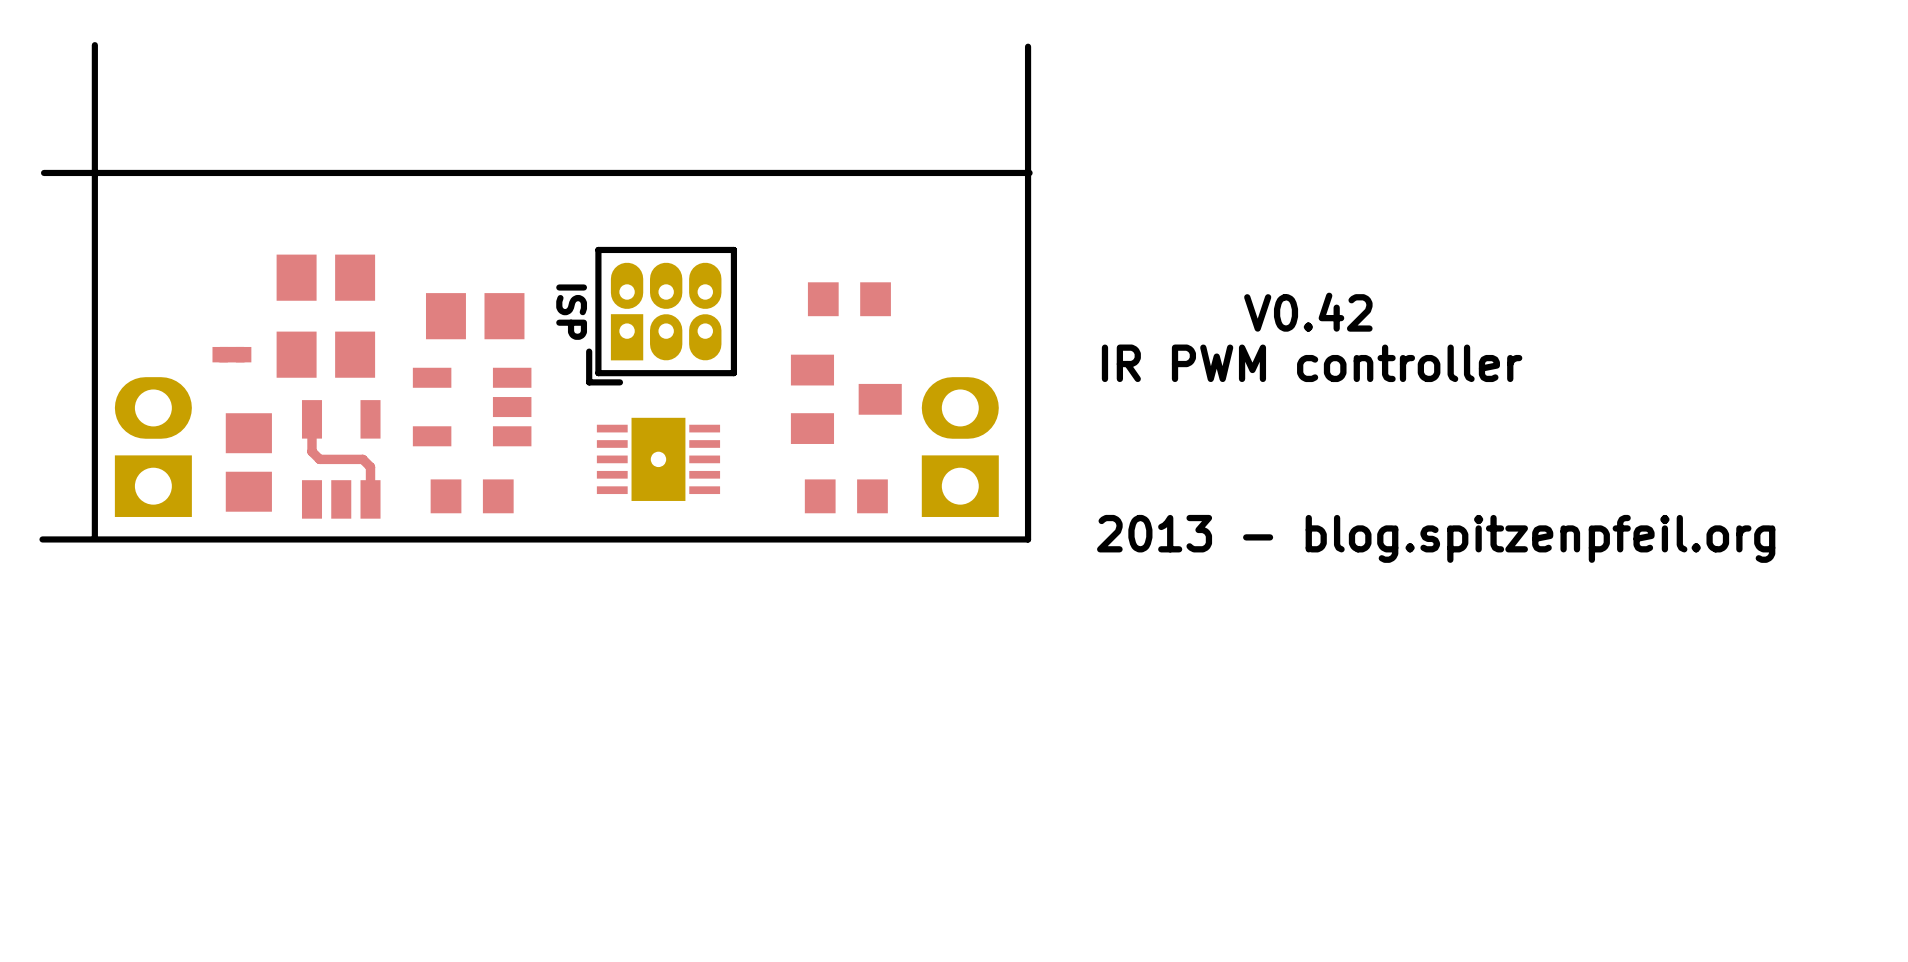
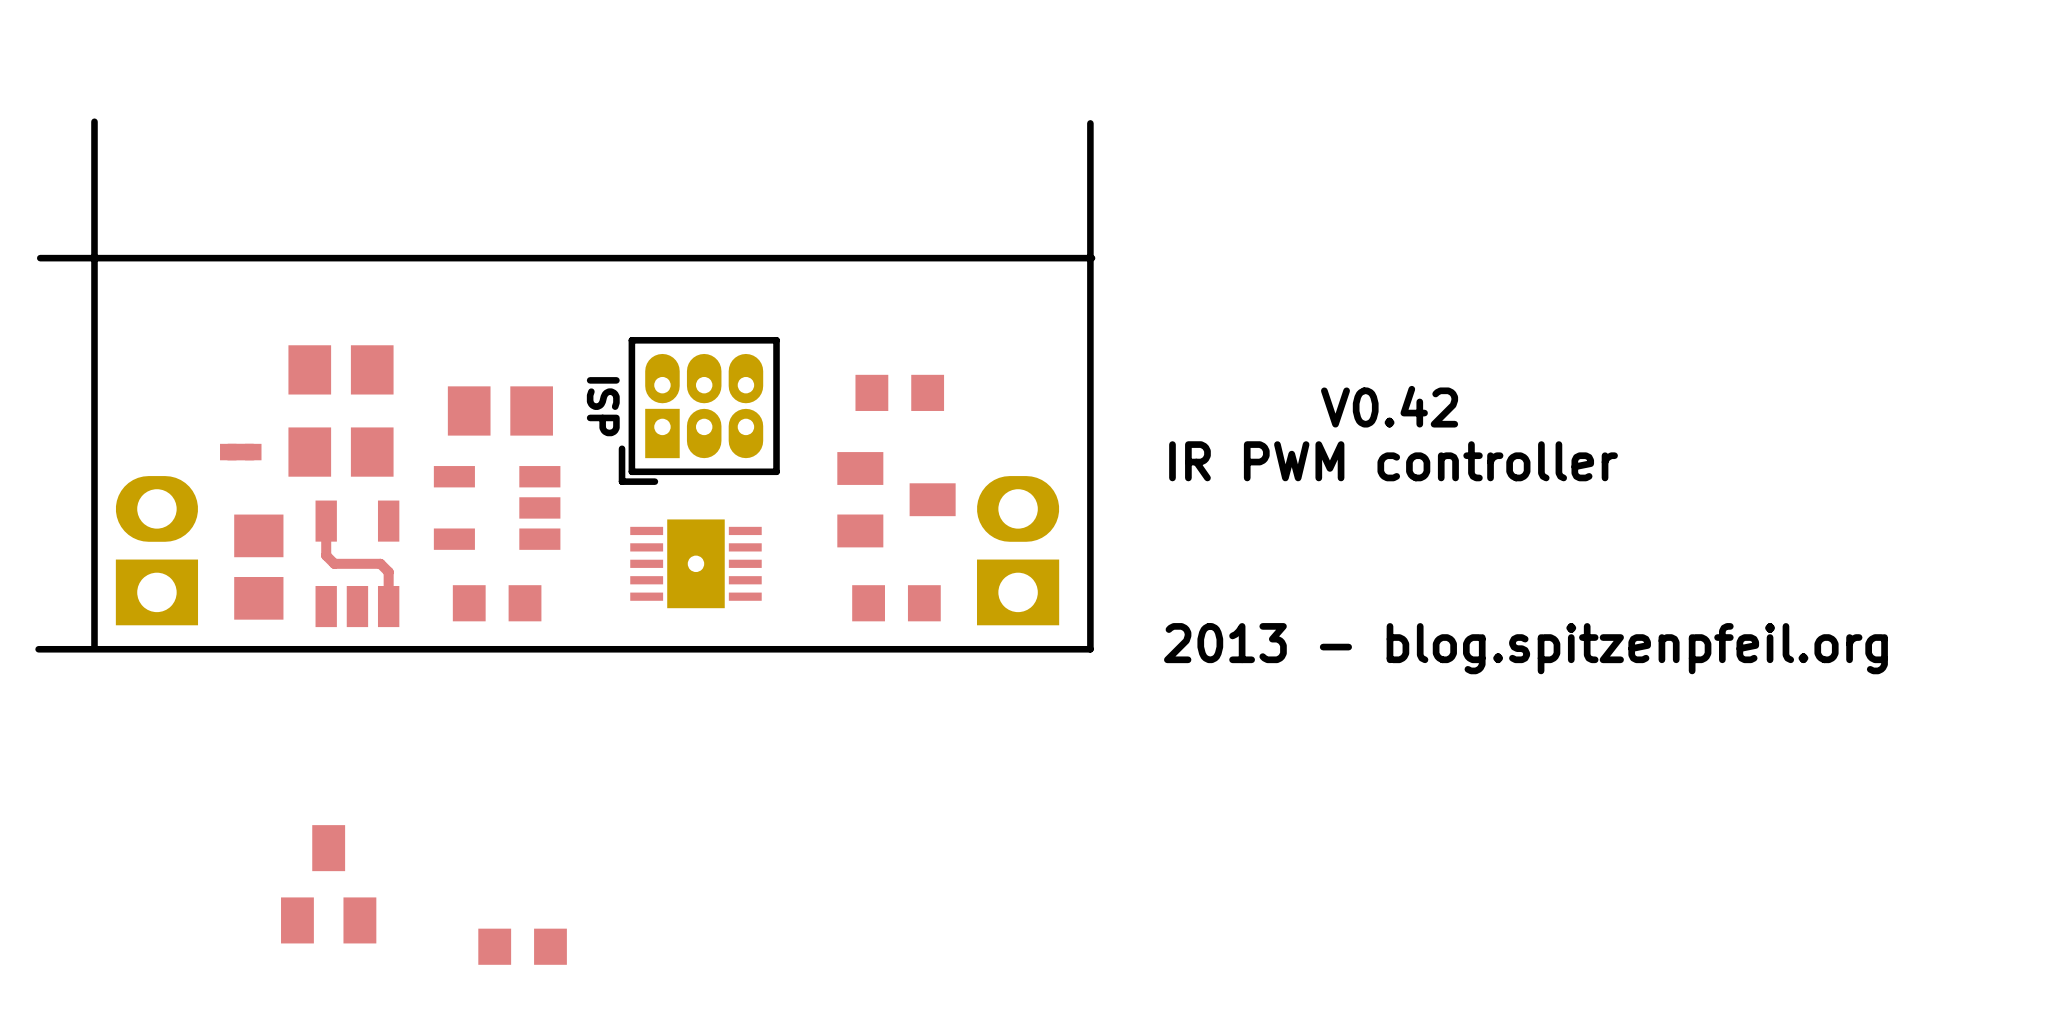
part: none -> (328, 884)
part: none -> (522, 946)

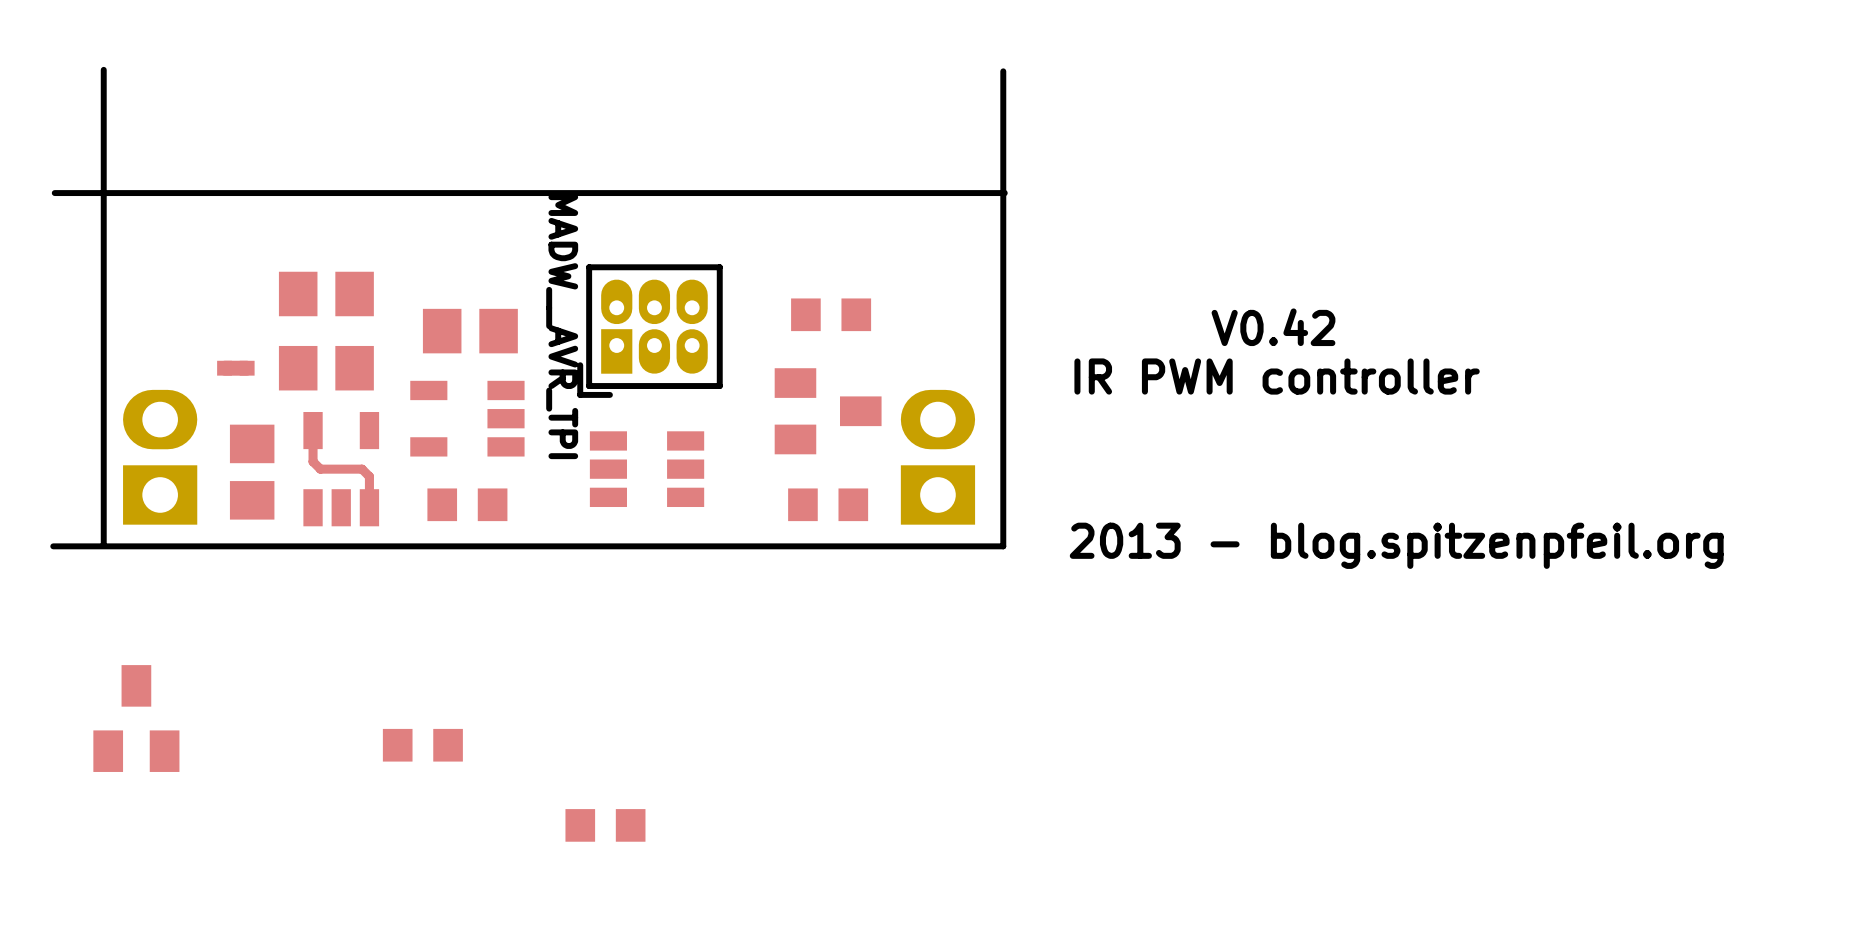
part value: ISP (603, 406) -> MADW__AVR_TPI (562, 326)
part footprint: [630, 519, 762, 609] -> [589, 431, 705, 508]
part: none -> (422, 745)
part position: (328, 884) -> (136, 718)
part: (522, 946) -> none
part: none -> (605, 825)

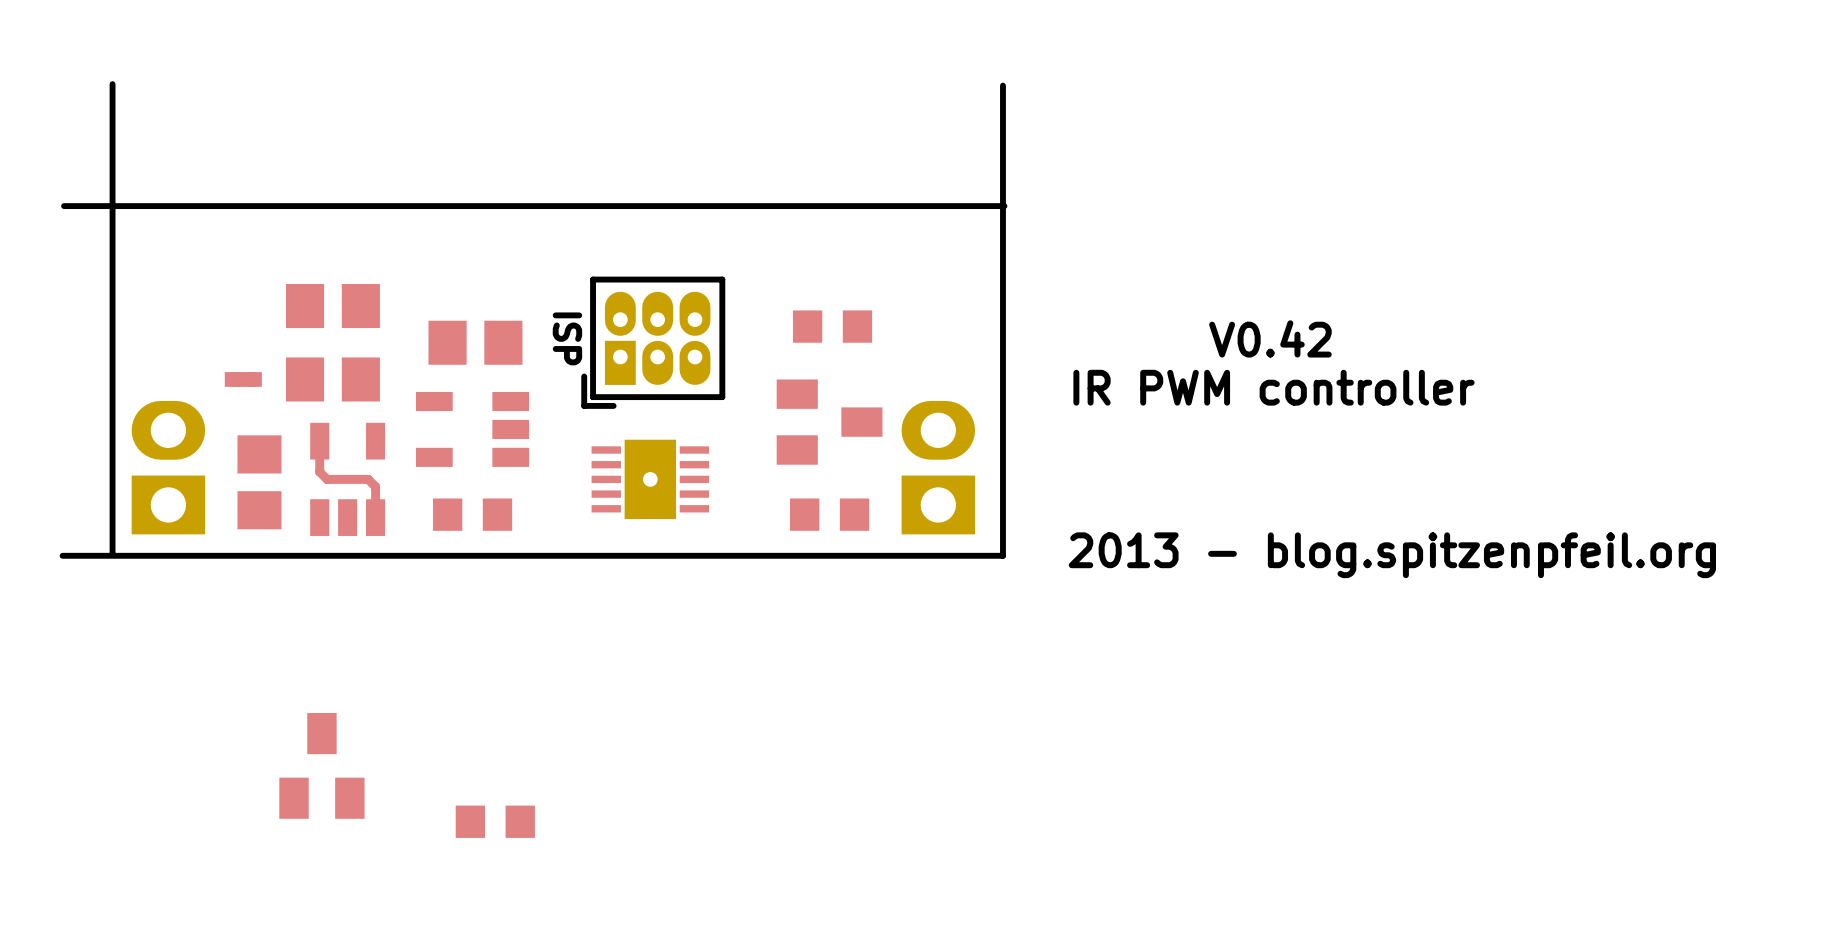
part value: MADW__AVR_TPI (562, 326) -> ISP (567, 338)
part footprint: [589, 431, 705, 508] -> [591, 439, 710, 520]
part position: (136, 718) -> (321, 765)
part: (422, 745) -> none
part: none -> (495, 821)
part: (605, 825) -> none

